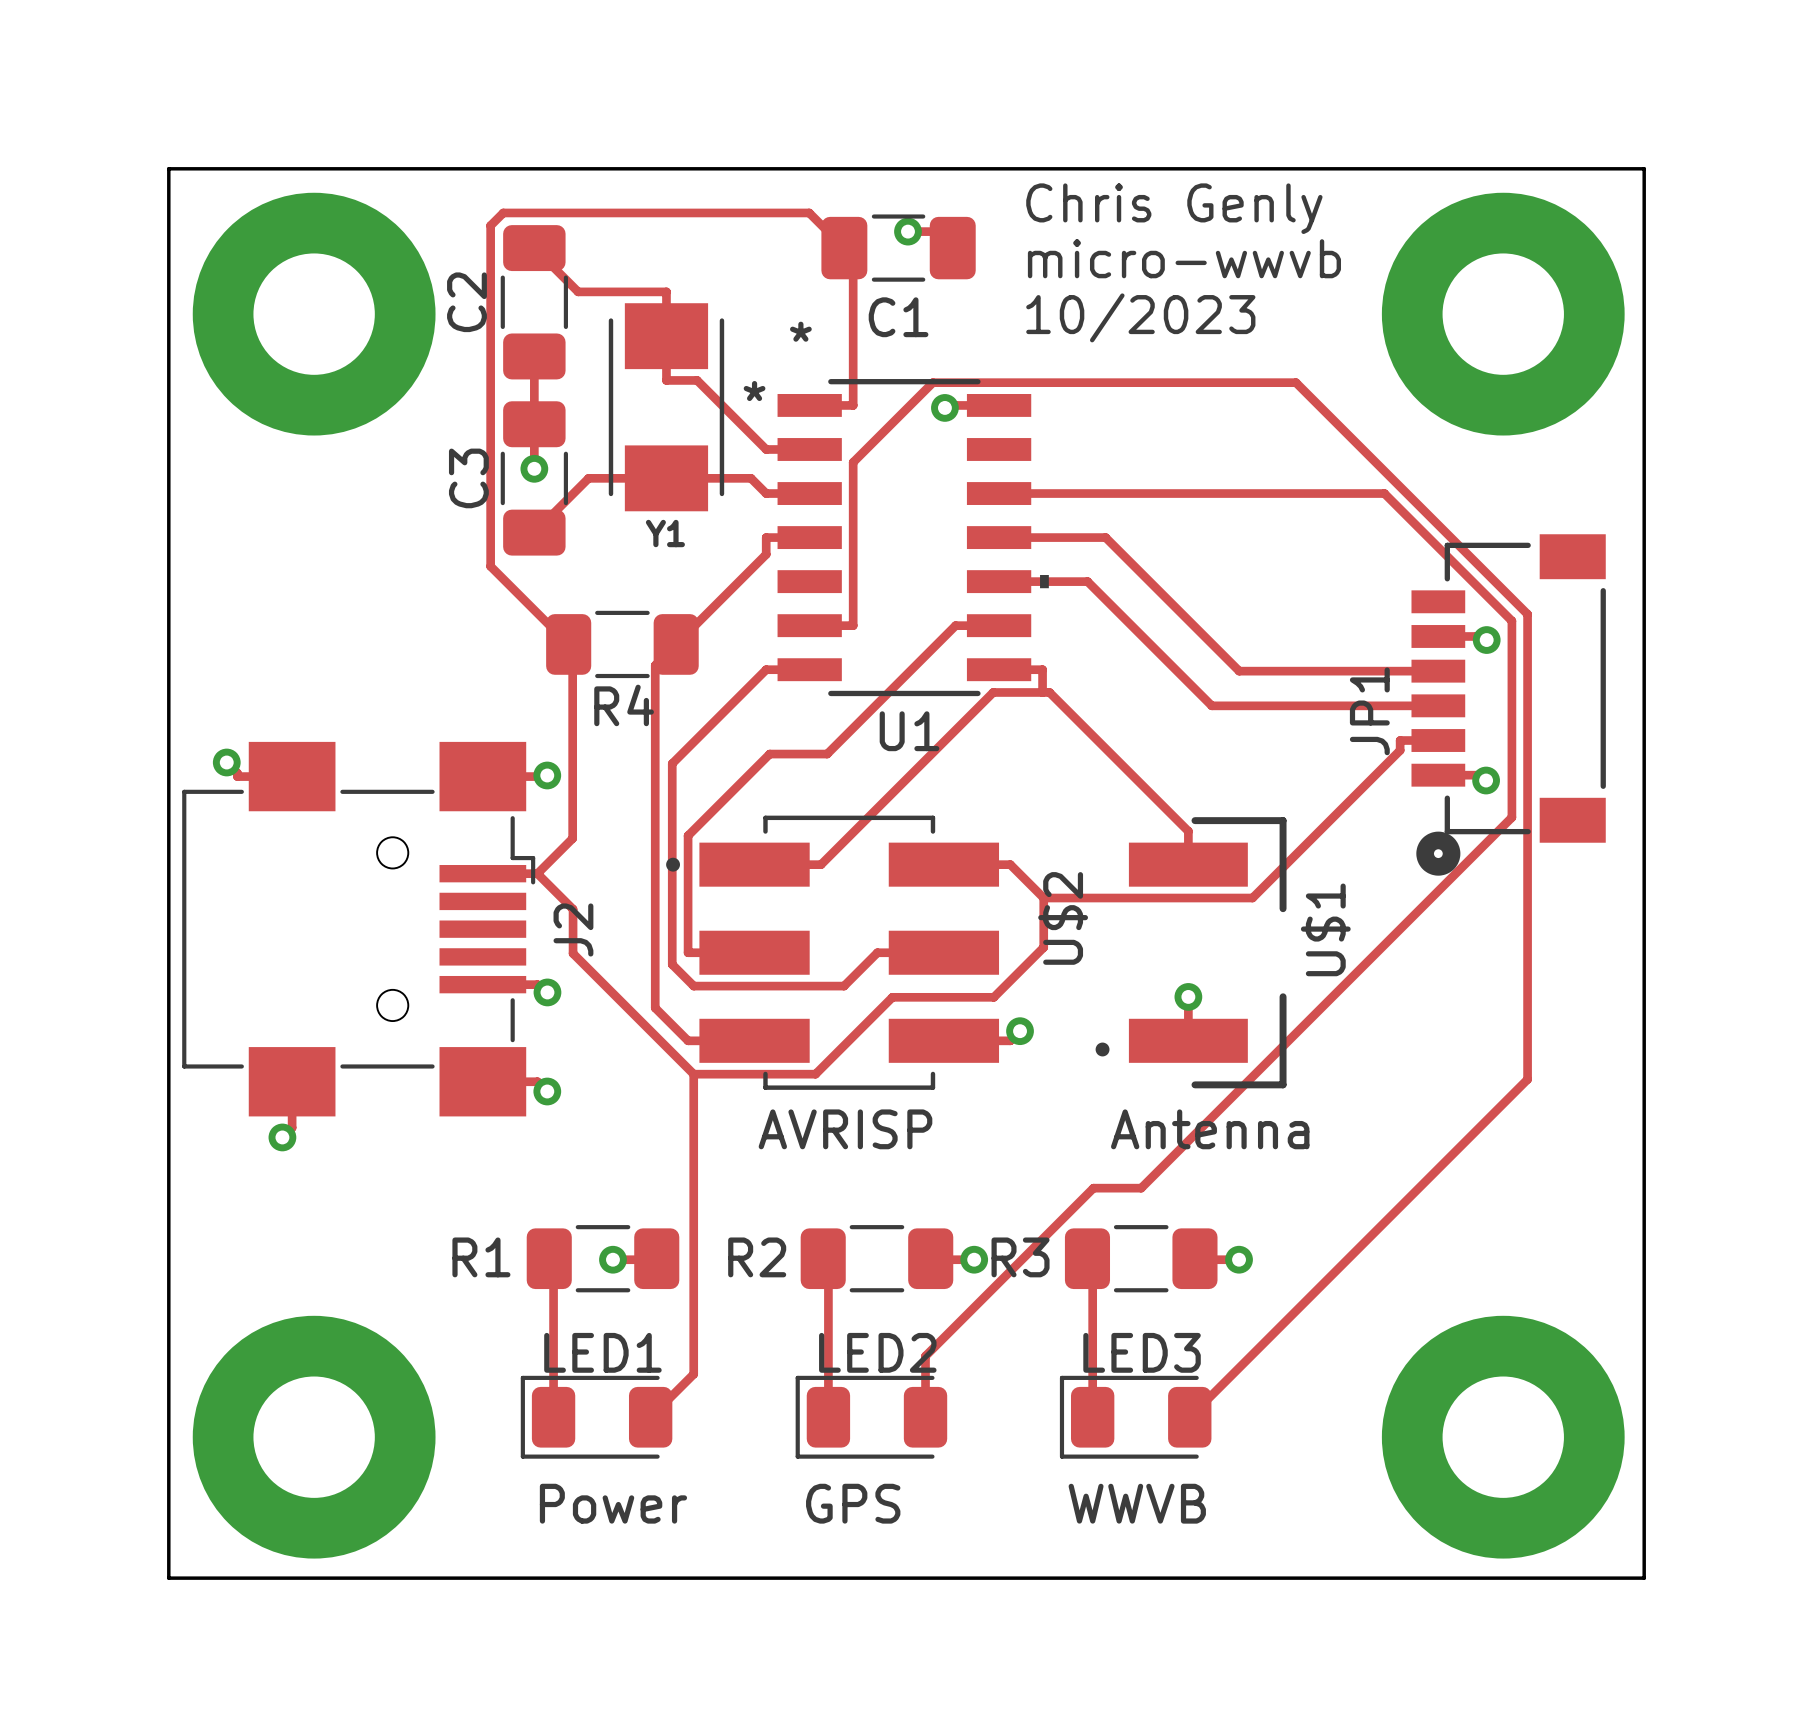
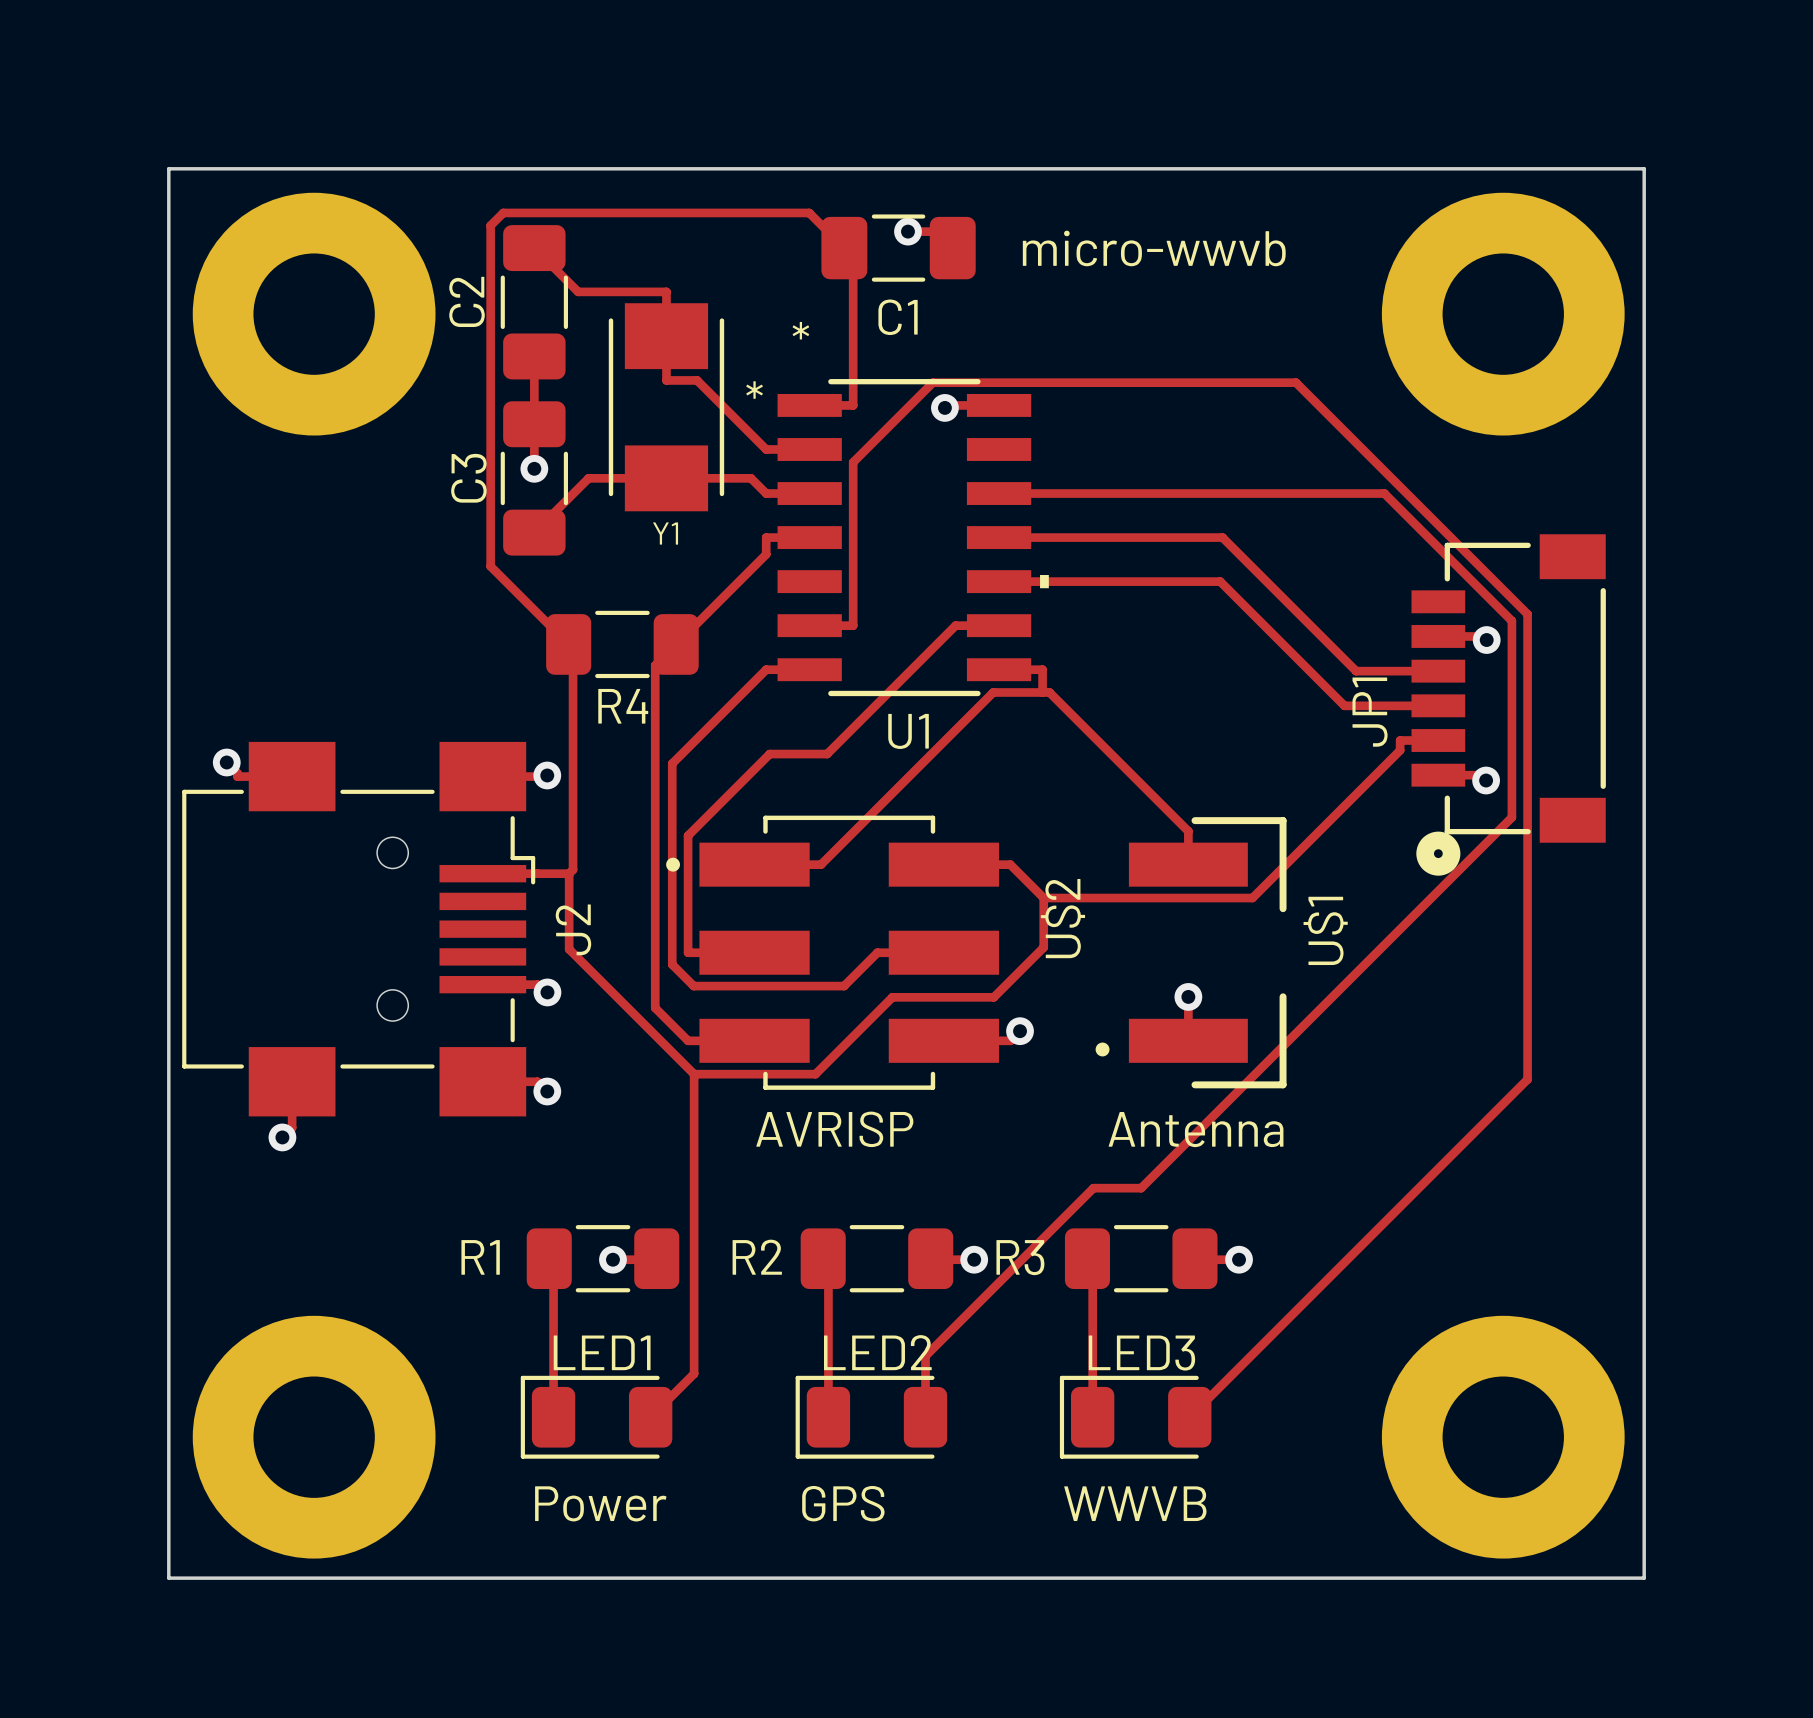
text: Chris Genly (1174, 208) -> none
text position: micro-wwvb (1184, 258) -> micro-wwvb (1154, 248)
text: 10/2023 (1140, 317) -> none
top track: (1105, 537) (1239, 671) (1356, 671) -> (1105, 537) (1222, 537) (1356, 671)
top track: (1087, 581) (1211, 705) (1344, 705) -> (1087, 581) (1220, 581) (1344, 705)
top track: (572, 648) (572, 838) (537, 873) (573, 909) (573, 953) (693, 1074) (693, 1374) -> (569, 873) (569, 949) (694, 1074) (694, 1373)
top track: none -> (573, 648) (573, 869) (569, 873)
top track: none -> (537, 873) (569, 873)

